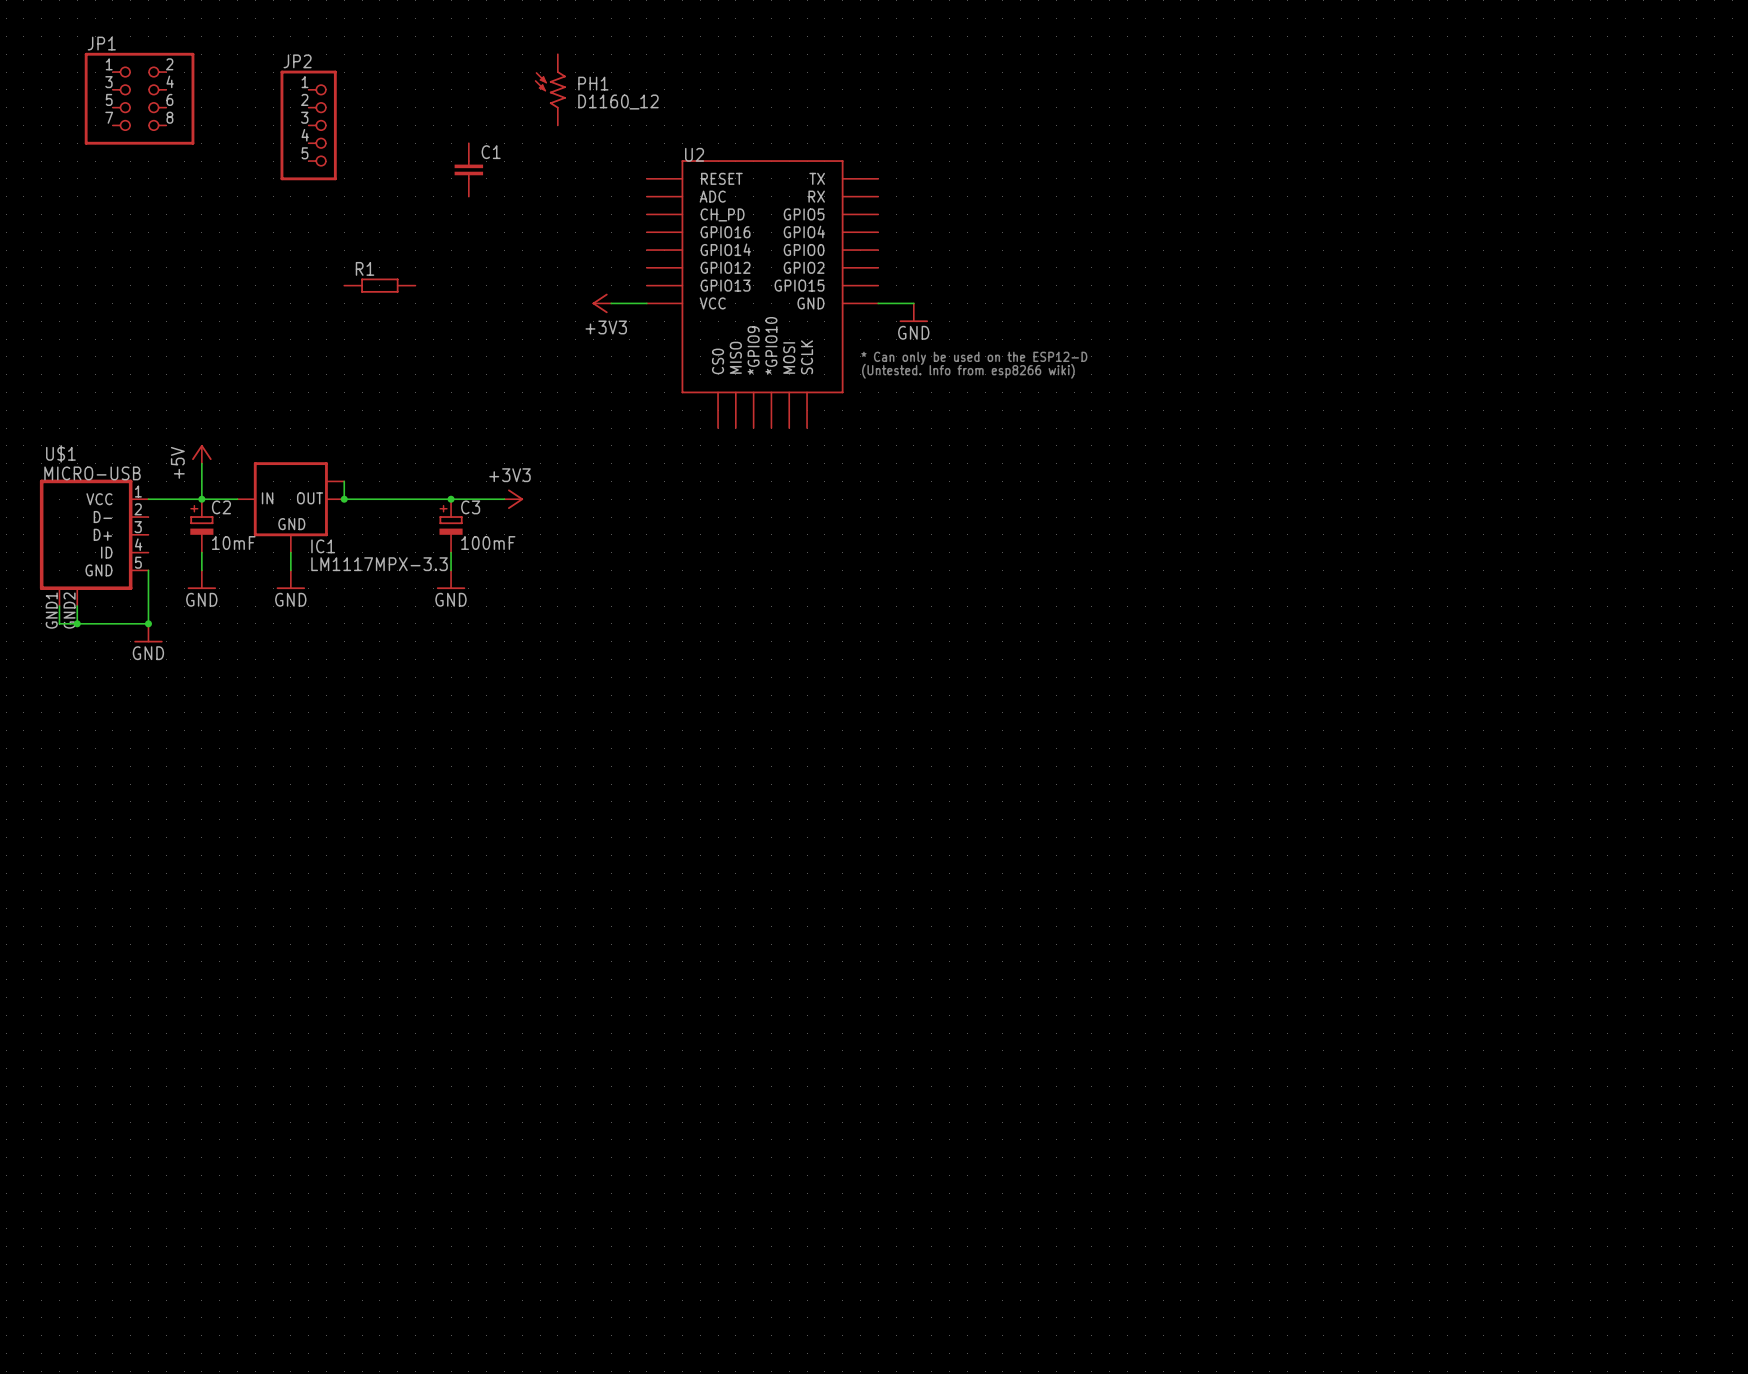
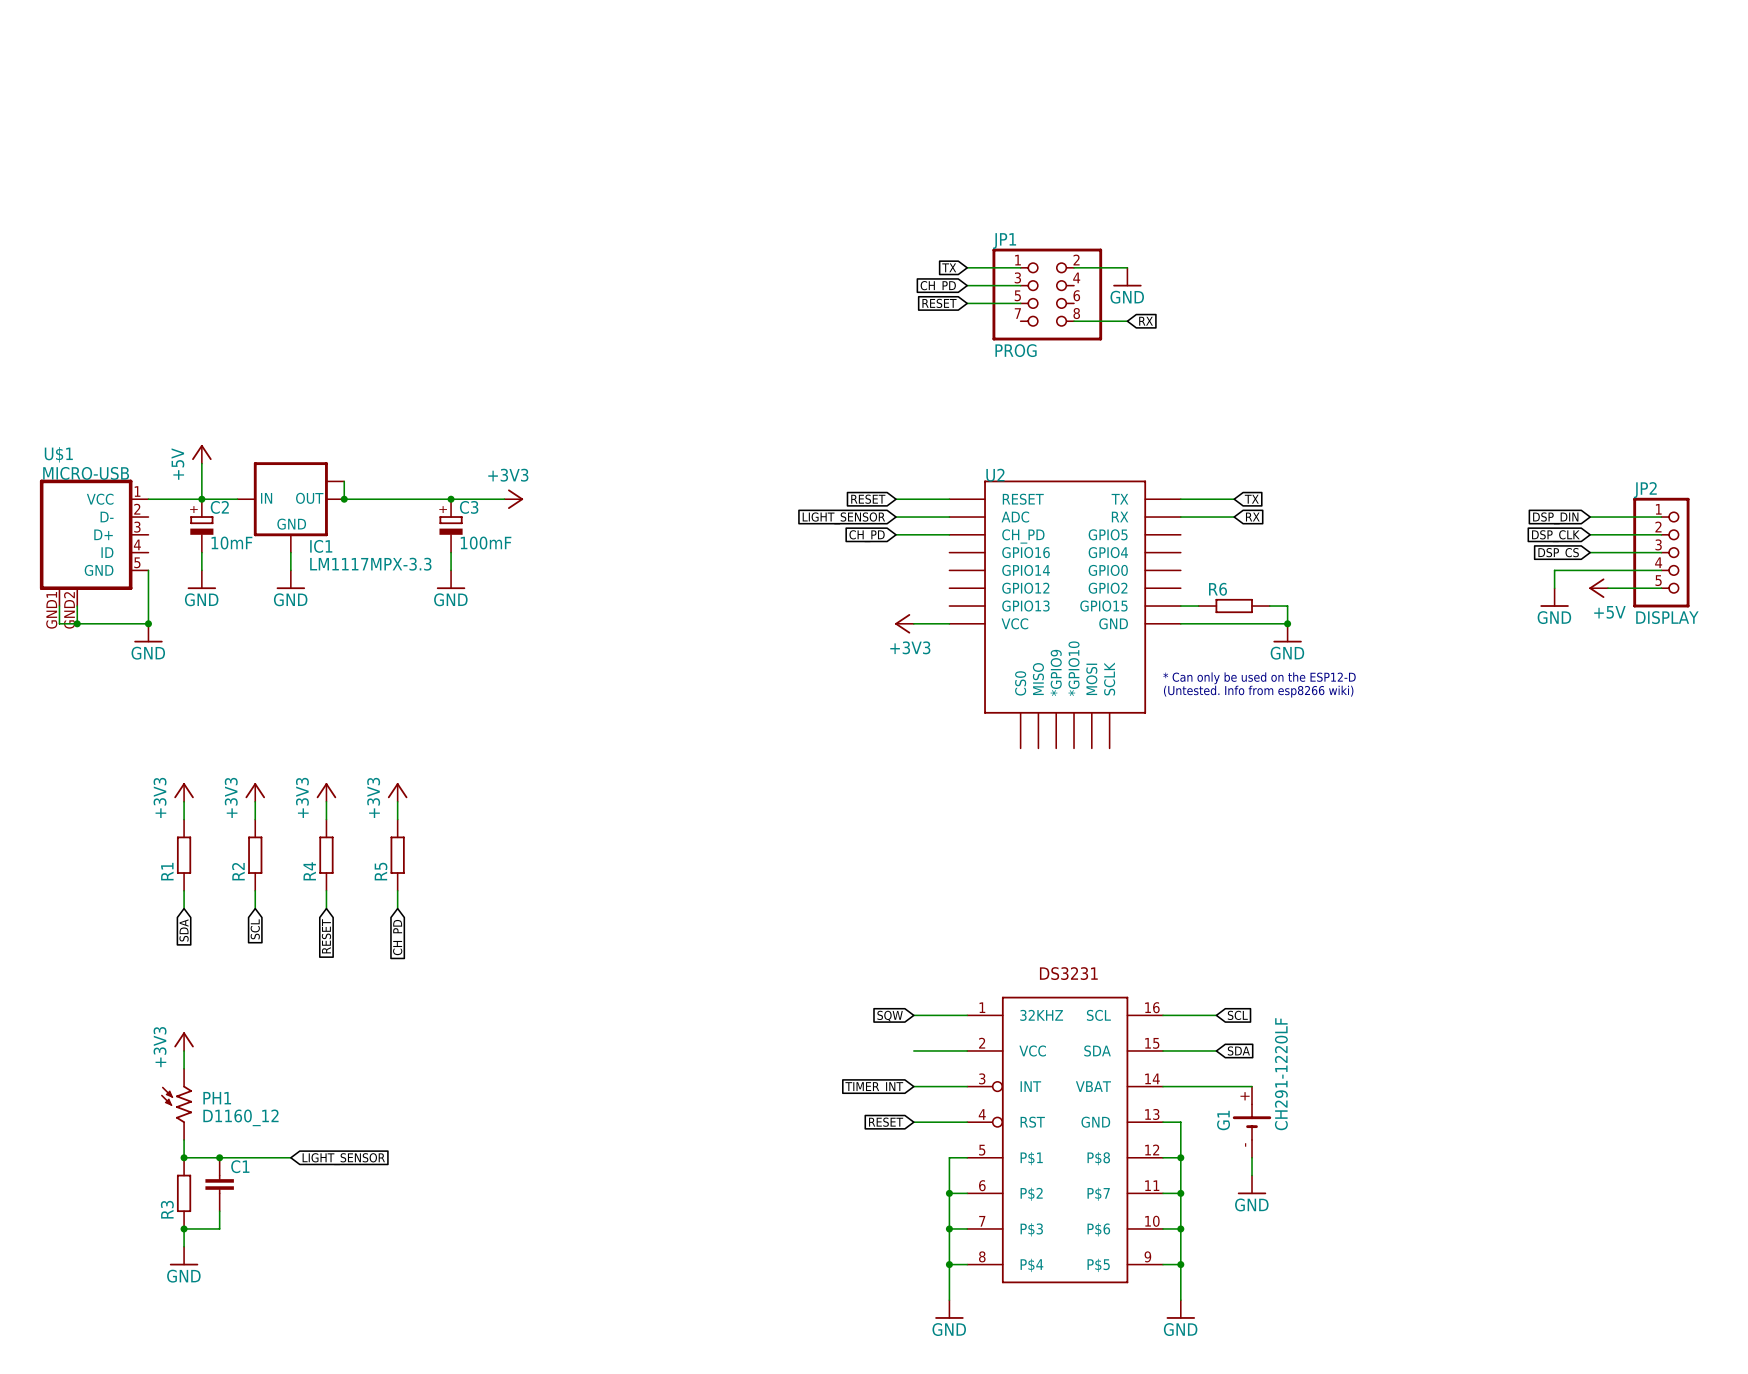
PH1 position: (550, 89) -> (176, 1104)
JP1 position: (139, 98) -> (1047, 294)
JP2 position: (308, 125) -> (1661, 552)
C1 position: (468, 169) -> (219, 1184)
global label: none -> TX (949, 267)
wire: none -> (967, 267) (1020, 267)
wire: none -> (1074, 267) (1127, 267)
R1 name position: R1 (365, 268) -> R1 (167, 871)
power symbol: none -> GND (1127, 277)
R1 rotation: 0° (379, 285) -> 90° clockwise (184, 855)
R1 position: (379, 285) -> (184, 855)
wire: none -> (967, 285) (1020, 285)
global label: none -> CH_PD (938, 286)
U2 position: (762, 294) -> (1065, 614)
power symbol: +3V3 (601, 303) -> none
wire: (611, 303) (646, 303) -> none
wire: (878, 303) (913, 303) -> none
global label: none -> RESET (939, 303)
wire: none -> (967, 303) (1020, 303)
power symbol: GND (913, 312) -> none
wire: none -> (1074, 321) (1127, 321)
global label: none -> RX (1146, 321)
JP1 value: none -> PROG (1016, 350)
global label: none -> RESET (868, 499)
wire: none -> (896, 499) (949, 499)
wire: none -> (1180, 499) (1234, 499)
global label: none -> TX (1251, 499)
global label: none -> LIGHT_SENSOR (843, 518)
wire: none -> (896, 517) (949, 517)
wire: none -> (1180, 517) (1234, 517)
global label: none -> RX (1252, 517)
global label: none -> DSP_DIN (1555, 518)
wire: none -> (1590, 517) (1661, 517)
wire: none -> (896, 534) (949, 534)
wire: none -> (1590, 534) (1661, 534)
global label: none -> CH_PD (867, 536)
global label: none -> DSP_CLK (1555, 536)
wire: none -> (1590, 552) (1661, 552)
global label: none -> DSP_CS (1558, 553)
wire: none -> (1661, 570) (1554, 570) (1554, 588)
power symbol: none -> +5V (1598, 588)
wire: none -> (1607, 588) (1661, 588)
power symbol: none -> GND (1554, 597)
wire: none -> (1180, 606) (1198, 606)
R6: none -> (1234, 606)
wire: none -> (1269, 606) (1287, 606) (1287, 623) (1180, 623)
JP2 value: none -> DISPLAY (1667, 617)
power symbol: none -> +3V3 (904, 623)
wire: none -> (913, 623) (949, 623)
junction: none -> (1287, 623)
power symbol: none -> GND (1287, 633)
power symbol: none -> +3V3 (184, 792)
power symbol: none -> +3V3 (255, 792)
power symbol: none -> +3V3 (326, 792)
power symbol: none -> +3V3 (397, 792)
wire: none -> (184, 801) (184, 819)
wire: none -> (255, 801) (255, 819)
wire: none -> (326, 801) (326, 819)
wire: none -> (397, 801) (397, 819)
R2: none -> (255, 855)
R4: none -> (326, 855)
R5: none -> (397, 855)
wire: none -> (184, 890) (184, 908)
wire: none -> (255, 890) (255, 908)
wire: none -> (326, 890) (326, 908)
wire: none -> (397, 890) (397, 908)
global label: none -> SDA (184, 930)
global label: none -> SCL (255, 929)
global label: none -> RESET (326, 936)
global label: none -> CH_PD (399, 937)
global label: none -> SQW (890, 1016)
wire: none -> (913, 1015) (967, 1015)
wire: none -> (1163, 1015) (1216, 1015)
global label: none -> SCL (1237, 1015)
power symbol: none -> +3V3 (184, 1041)
wire: none -> (184, 1050) (184, 1068)
wire: none -> (913, 1050) (967, 1050)
wire: none -> (1163, 1050) (1216, 1050)
global label: none -> SDA (1238, 1050)
wire: none -> (913, 1086) (967, 1086)
wire: none -> (1163, 1086) (1252, 1086)
global label: none -> TIMER_INT (874, 1088)
global label: none -> RESET (886, 1122)
wire: none -> (913, 1122) (967, 1122)
wire: none -> (1163, 1122) (1180, 1122) (1180, 1300)
G1: none -> CH291-1220LF (1252, 1122)
wire: none -> (184, 1139) (184, 1157) (290, 1157)
part: none -> (1065, 1139)
junction: none -> (184, 1157)
junction: none -> (219, 1157)
wire: none -> (967, 1157) (949, 1157) (949, 1300)
wire: none -> (1163, 1157) (1180, 1157)
junction: none -> (1180, 1157)
wire: none -> (1252, 1157) (1252, 1175)
global label: none -> LIGHT_SENSOR (343, 1159)
power symbol: none -> GND (1252, 1184)
R3: none -> (184, 1193)
wire: none -> (949, 1193) (967, 1193)
junction: none -> (949, 1193)
wire: none -> (1163, 1193) (1180, 1193)
junction: none -> (1180, 1193)
wire: none -> (219, 1211) (219, 1228) (184, 1228) (184, 1246)
junction: none -> (184, 1228)
wire: none -> (949, 1228) (967, 1228)
junction: none -> (949, 1228)
wire: none -> (1163, 1228) (1180, 1228)
junction: none -> (1180, 1228)
power symbol: none -> GND (184, 1256)
wire: none -> (949, 1264) (967, 1264)
junction: none -> (949, 1264)
wire: none -> (1163, 1264) (1180, 1264)
junction: none -> (1180, 1264)
power symbol: none -> GND (949, 1309)
power symbol: none -> GND (1180, 1309)

